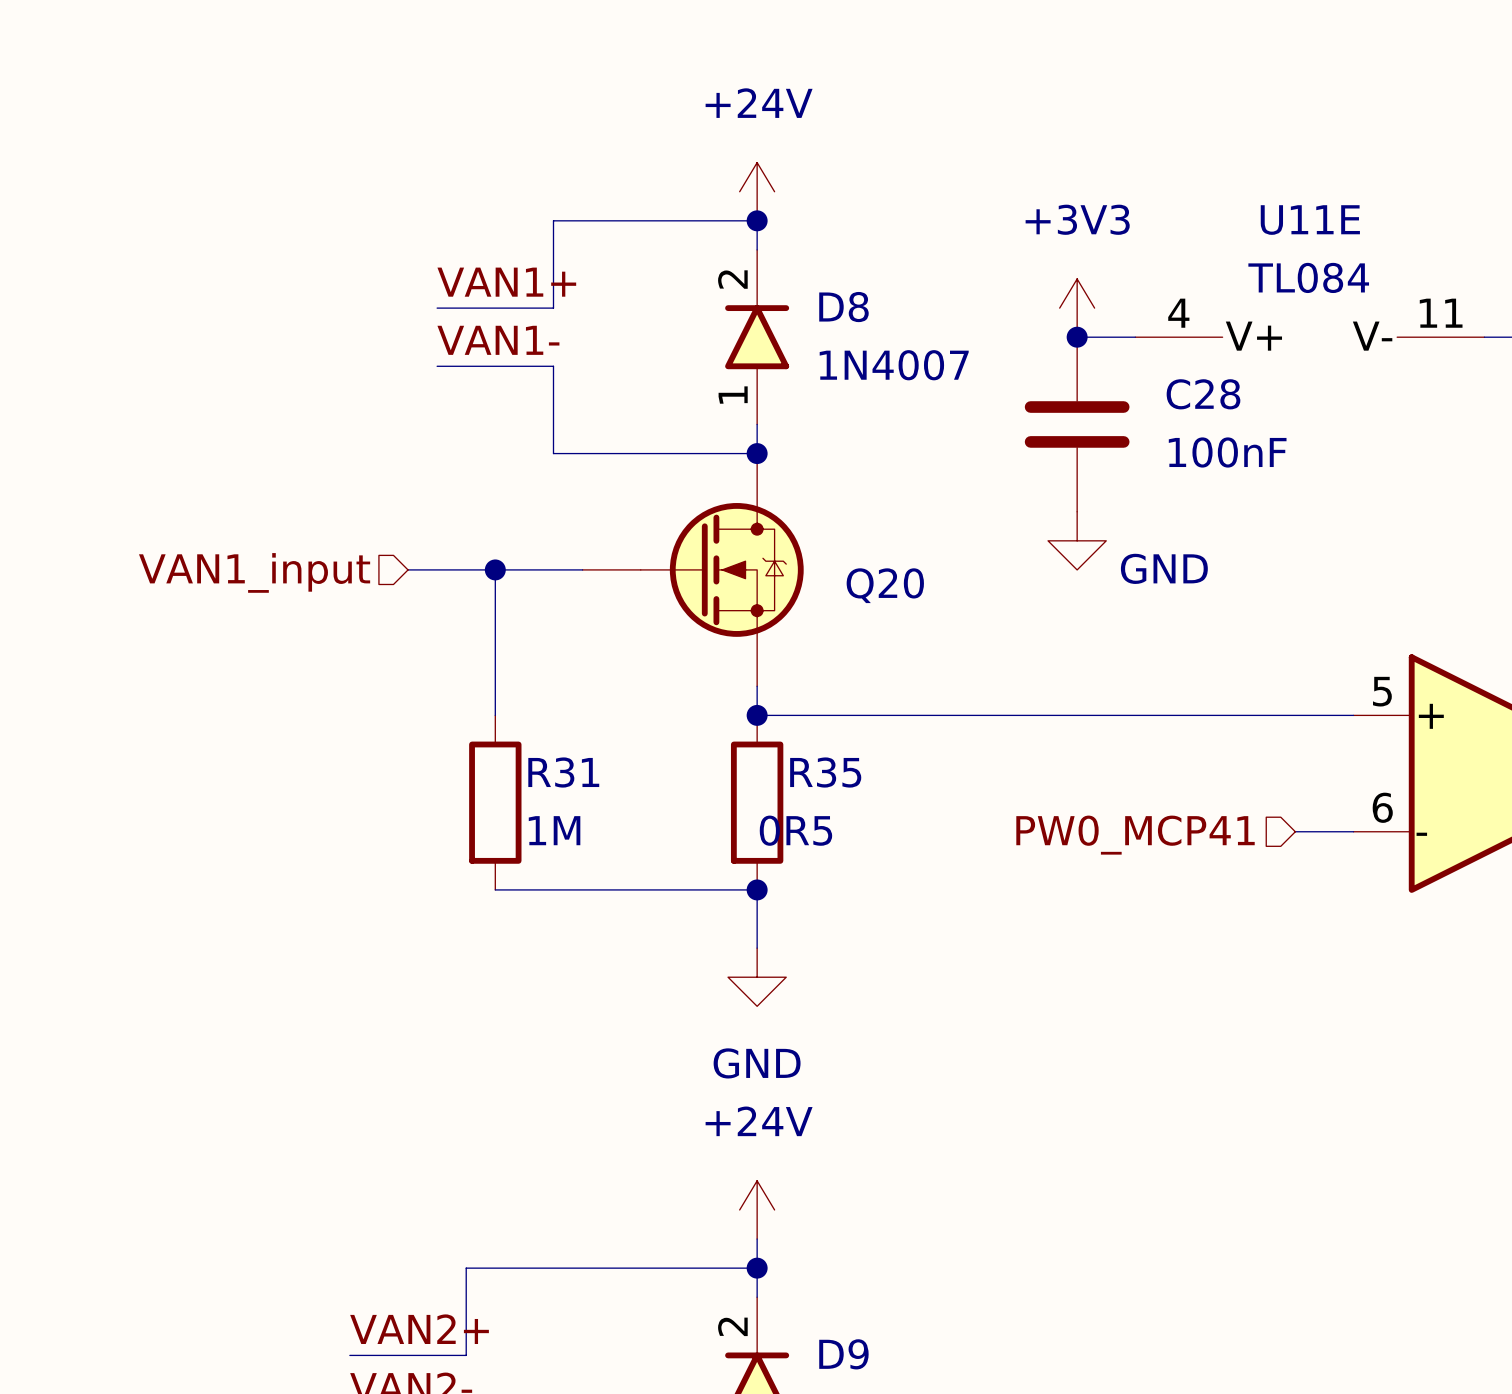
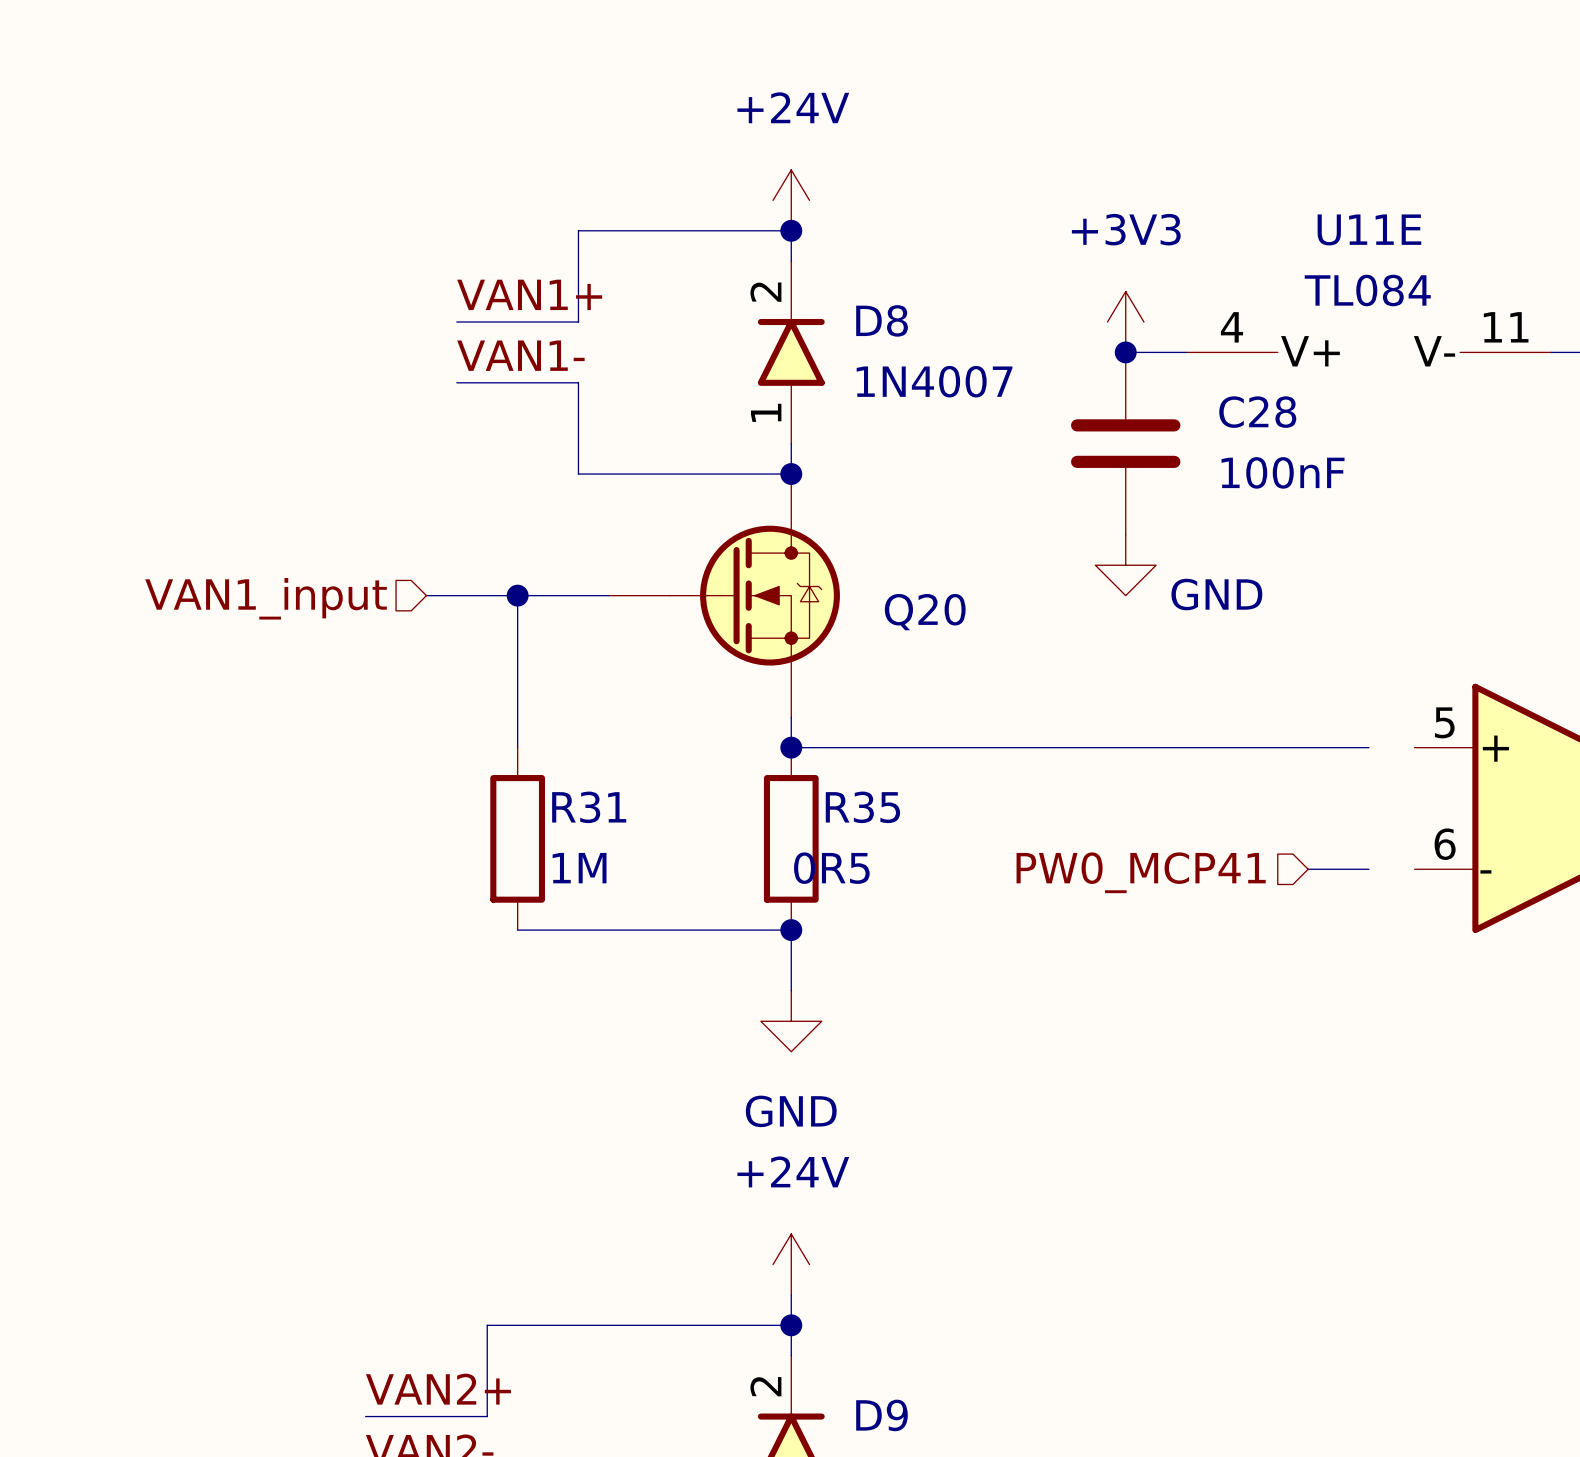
wire: (1309, 715) (1353, 715) -> none
wire: (1309, 831) (1353, 831) -> (1308, 869) (1353, 869)
hierarchical label position: PW0_MCP41 (1135, 835) -> PW0_MCP41 (1141, 872)

